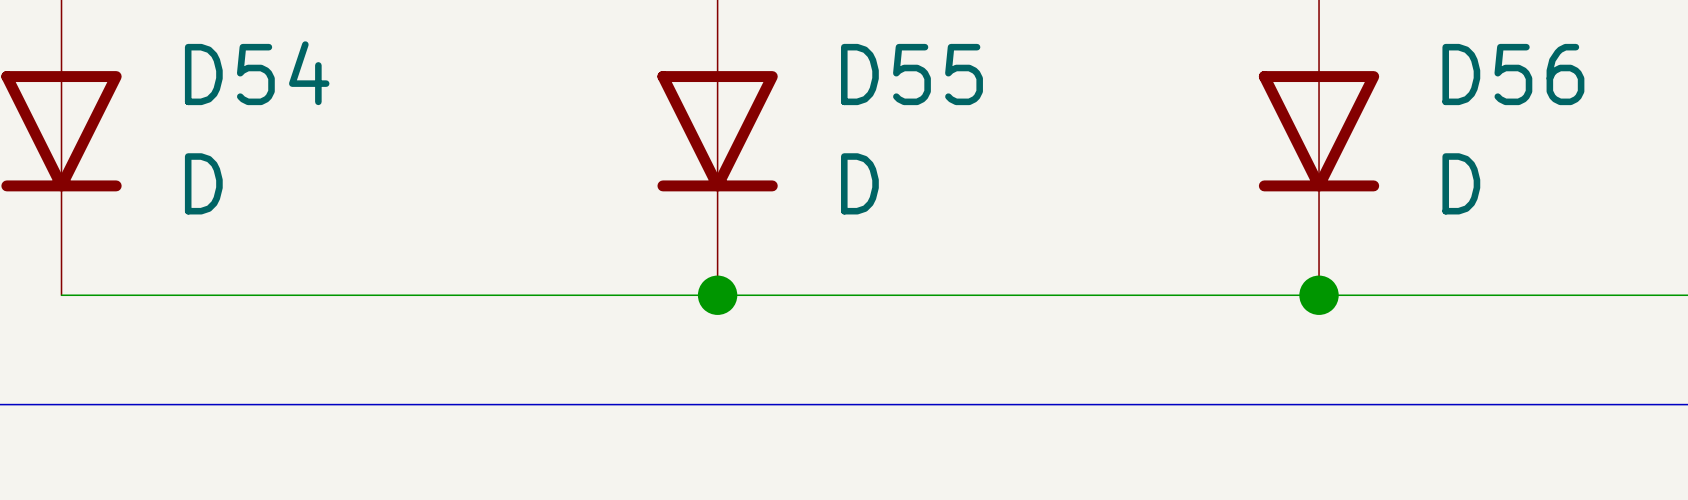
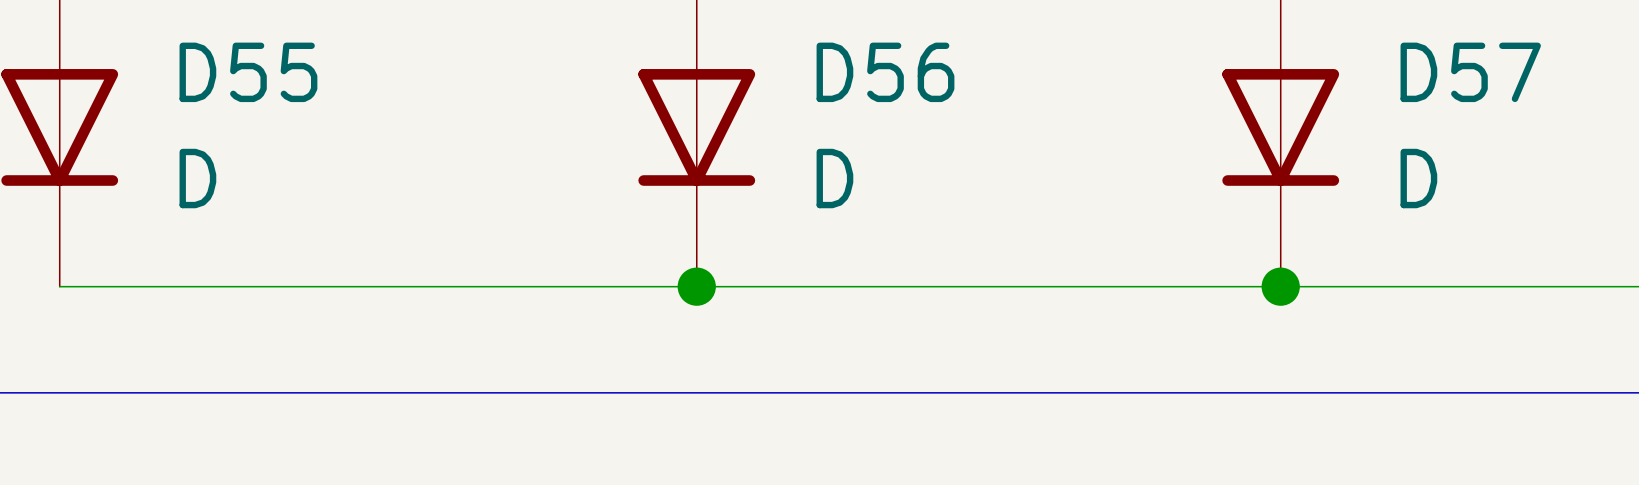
D54 name: D54 (257, 73) -> D55 (248, 72)
D55 name: D55 (911, 74) -> D56 (885, 72)
D56 name: D56 (1513, 74) -> D57 (1470, 72)

